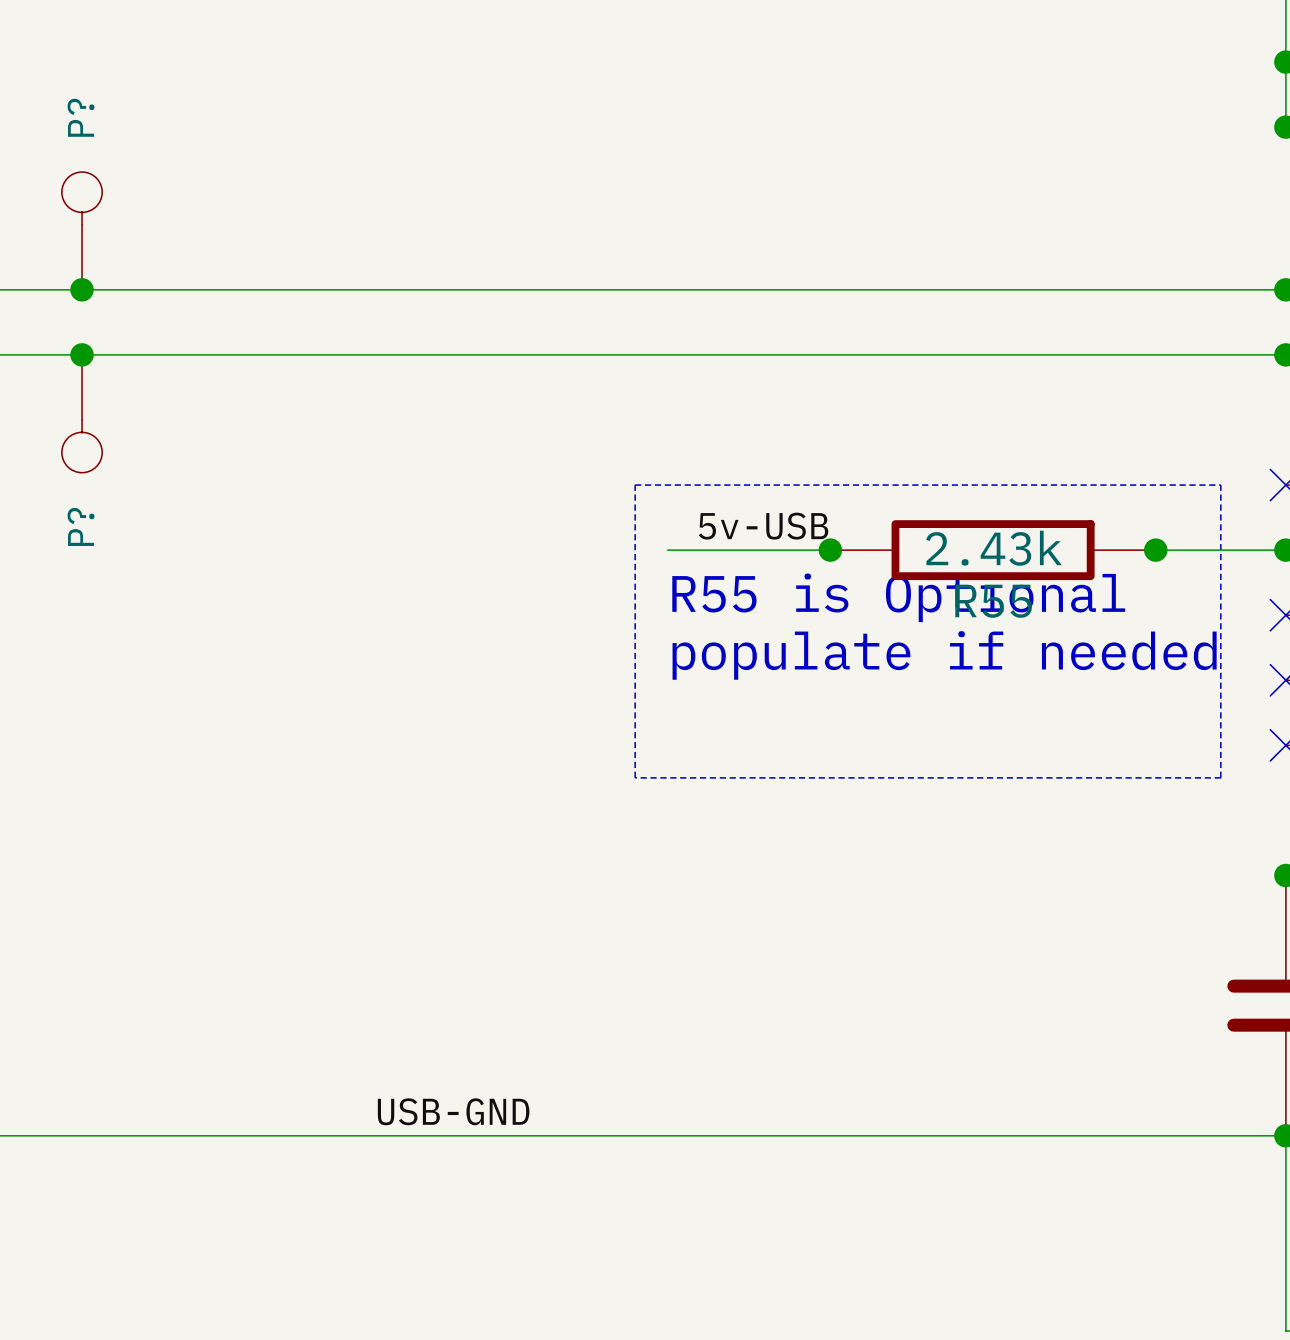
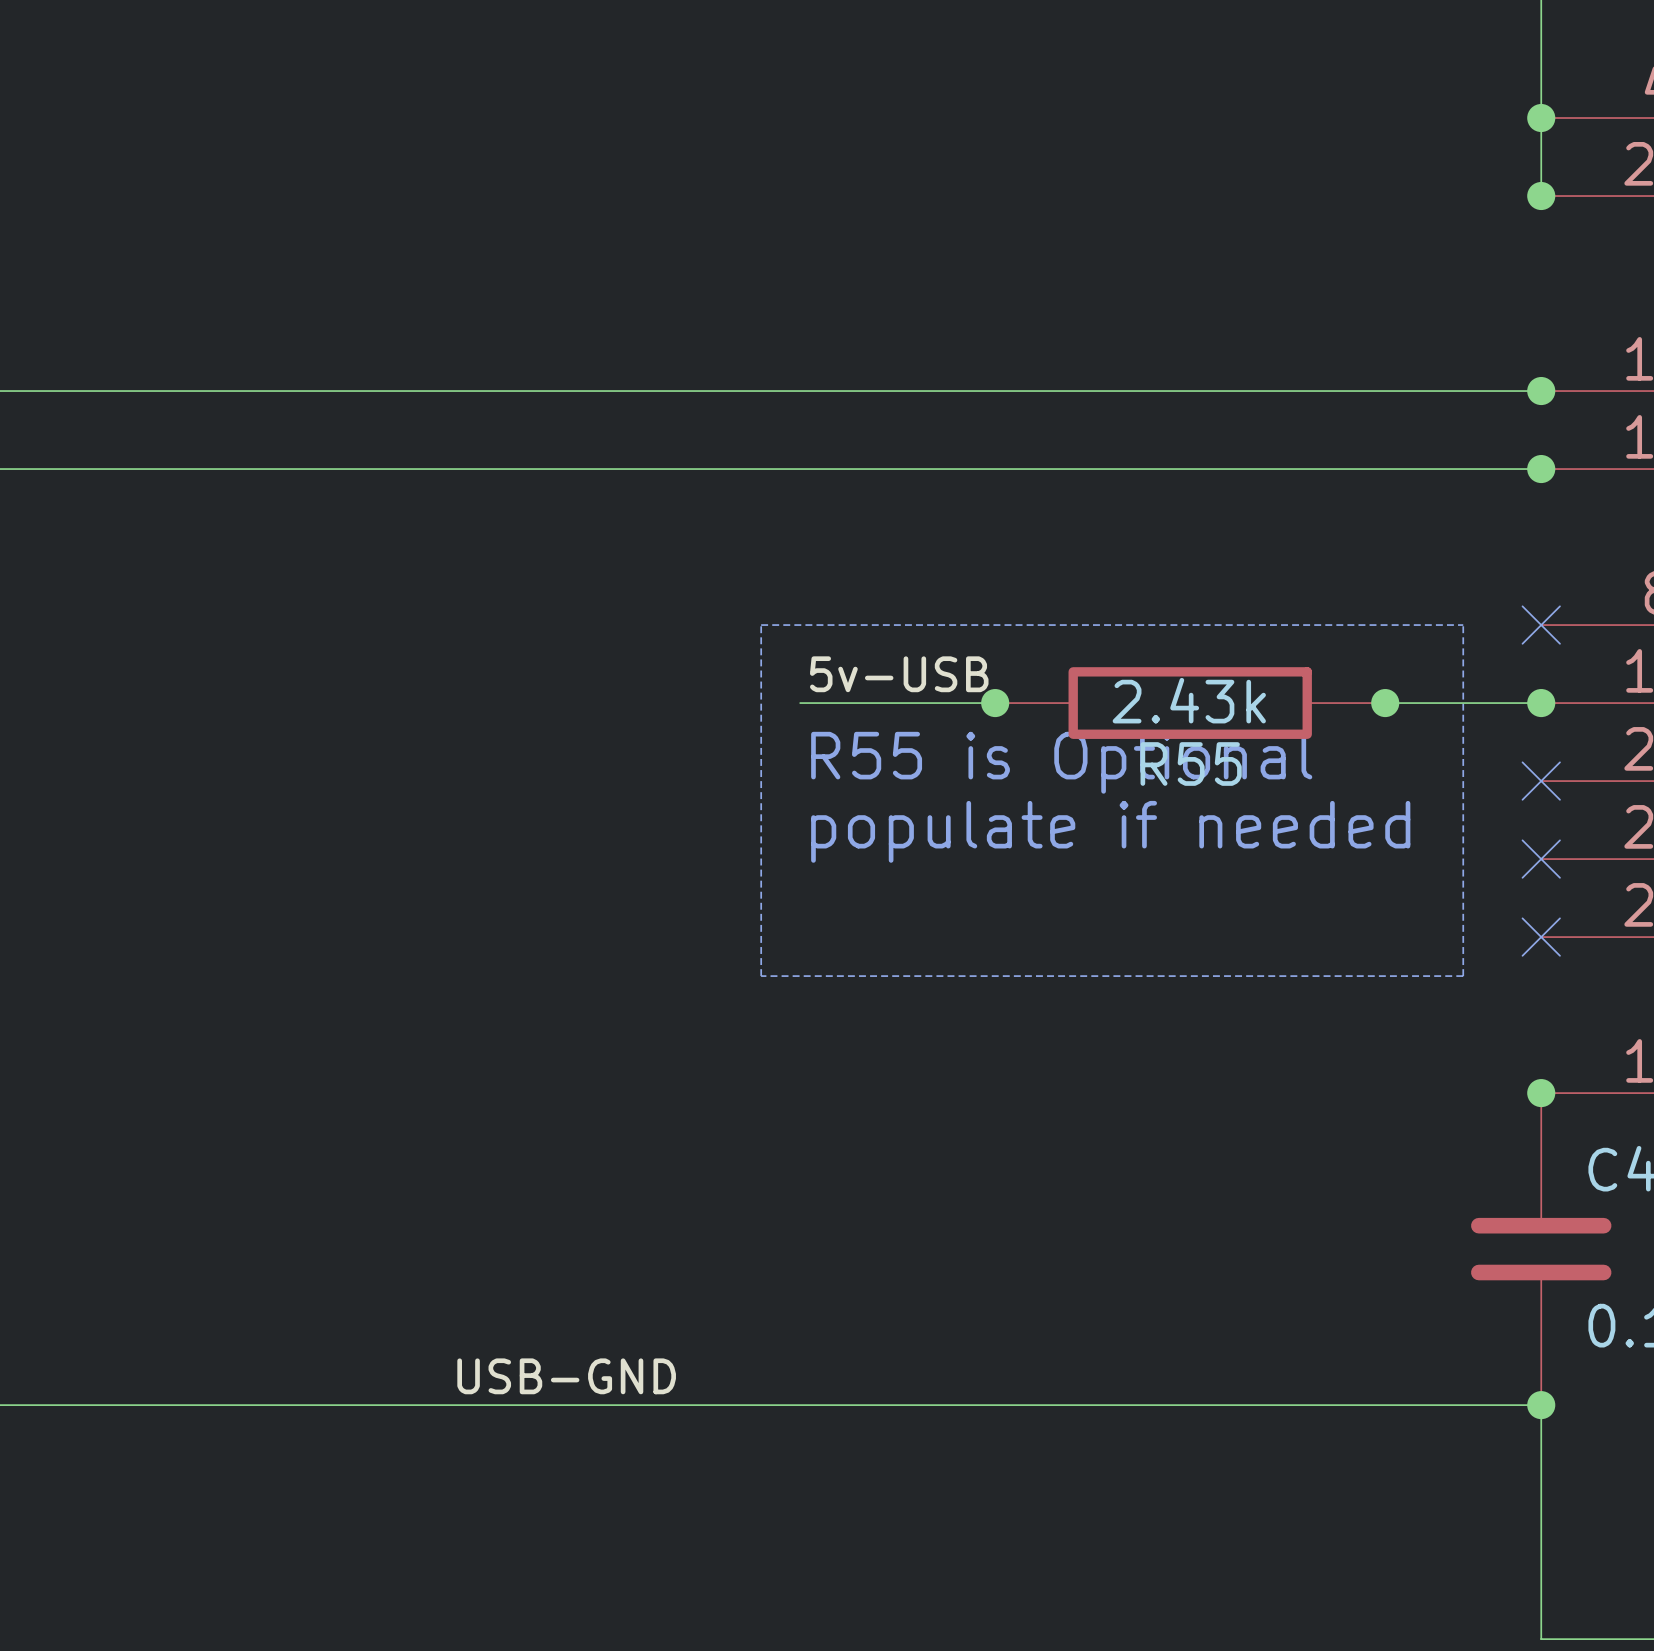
P?: (82, 230) -> none
junction: (82, 289) -> none
junction: (82, 354) -> none
P?: (82, 413) -> none

